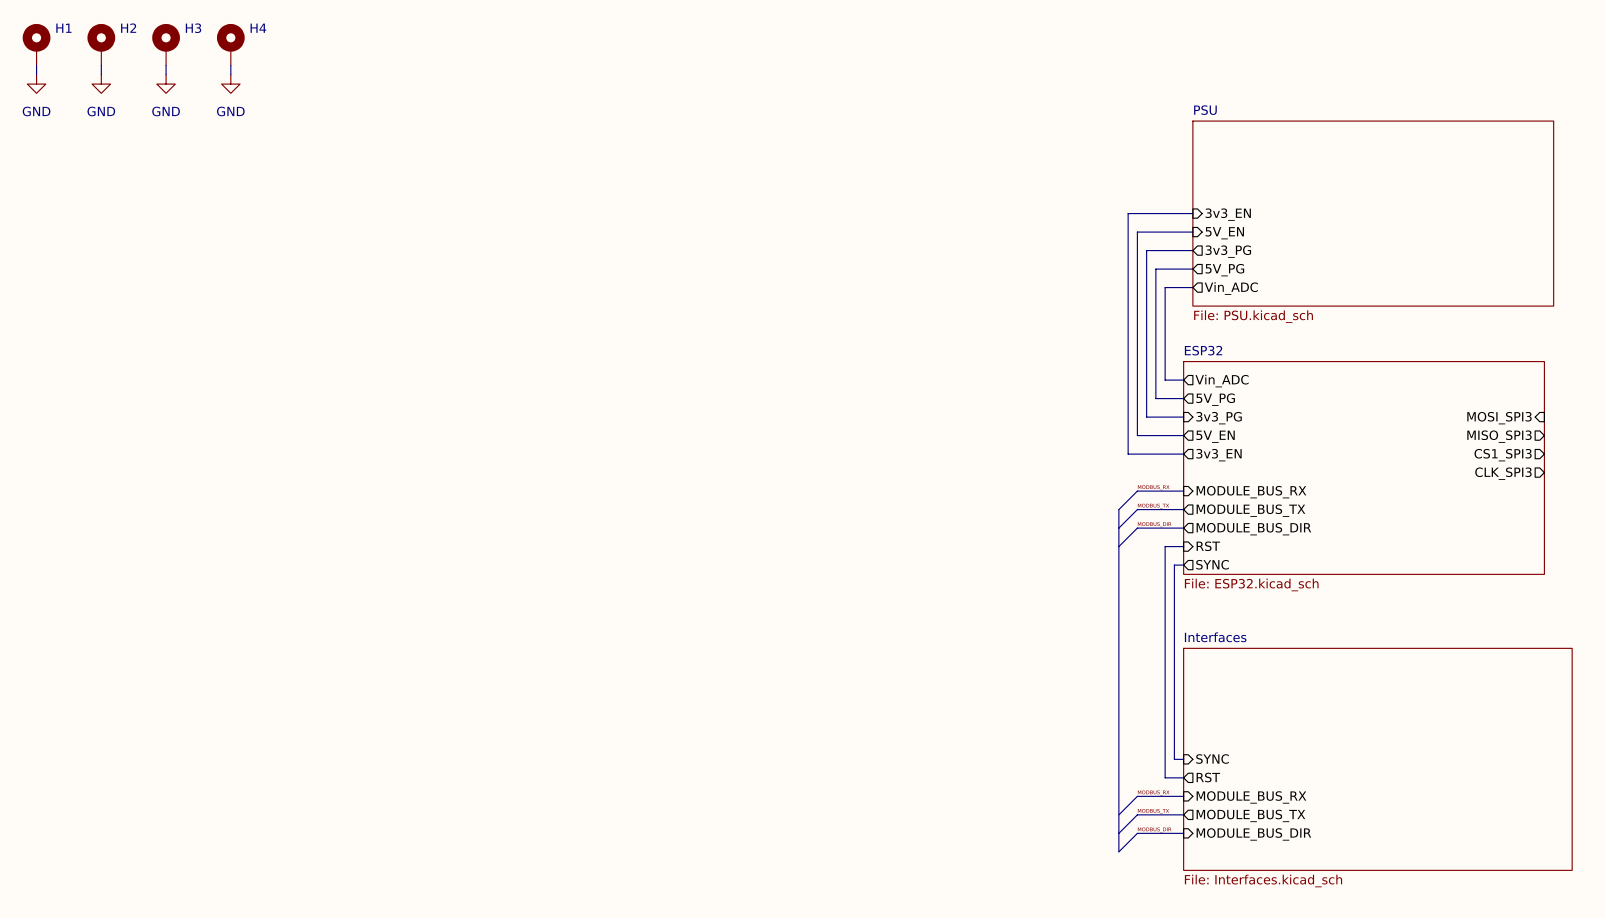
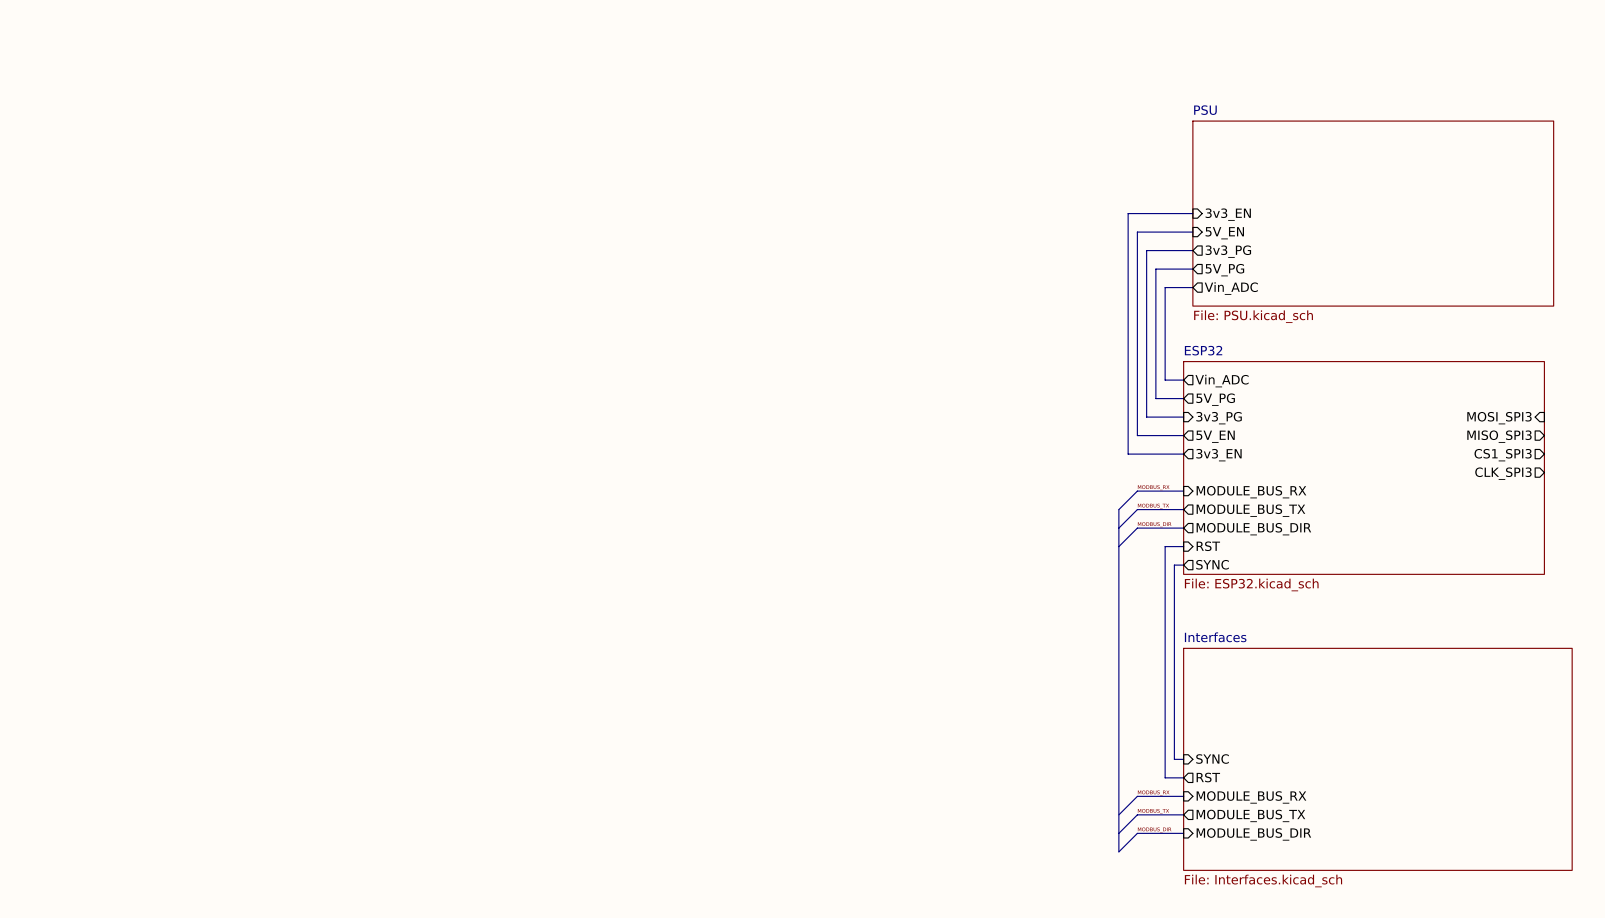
H1: (36, 44) -> none
H2: (101, 44) -> none
H3: (166, 44) -> none
H4: (230, 44) -> none
wire: (36, 65) (36, 74) -> none
wire: (101, 65) (101, 74) -> none
wire: (166, 65) (166, 74) -> none
wire: (230, 65) (230, 74) -> none
power symbol: GND (36, 84) -> none
power symbol: GND (101, 84) -> none
power symbol: GND (166, 84) -> none
power symbol: GND (230, 84) -> none

